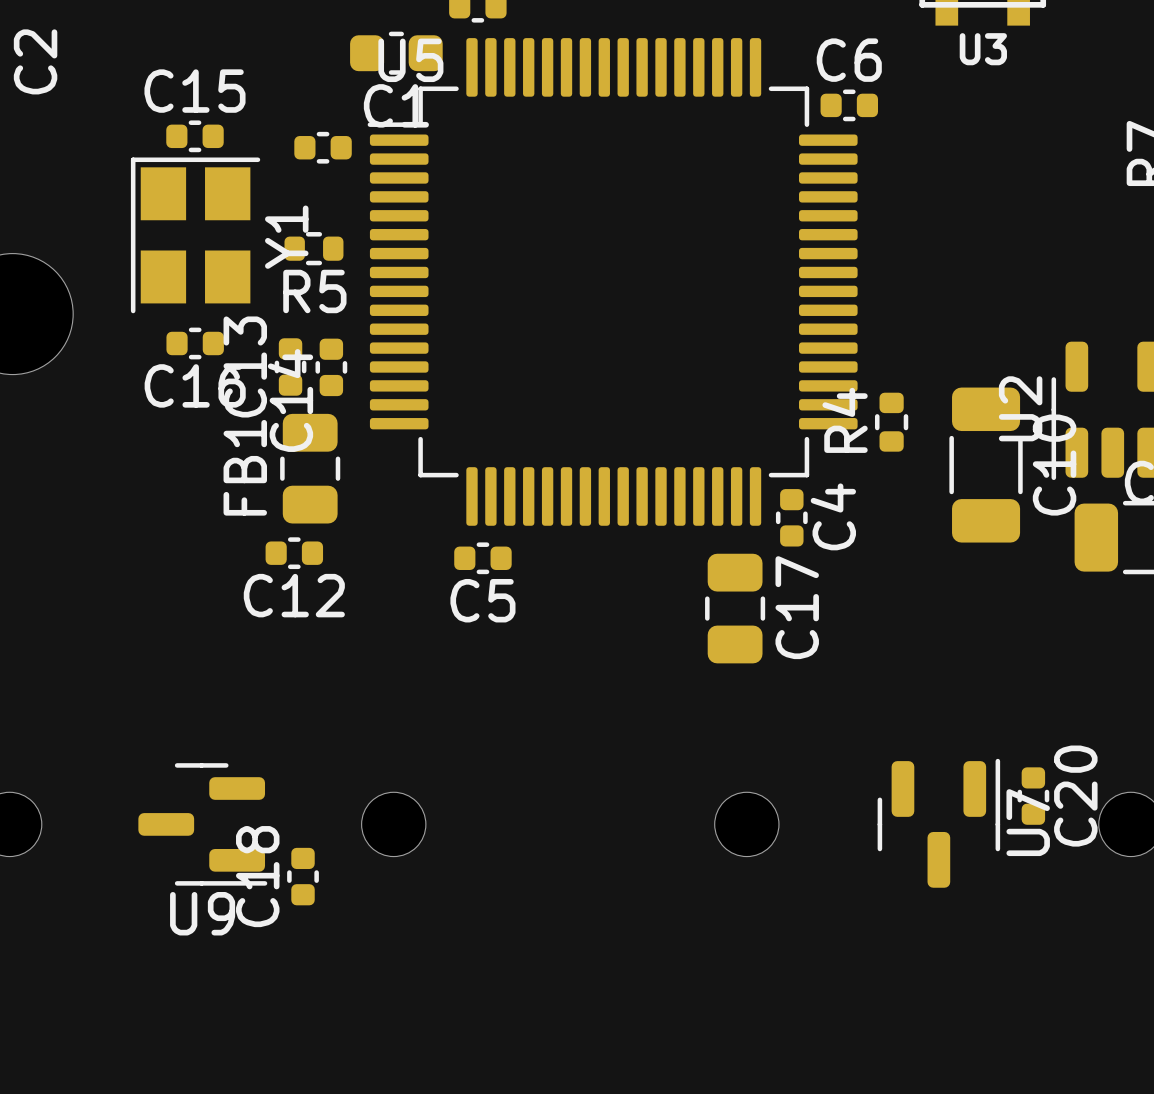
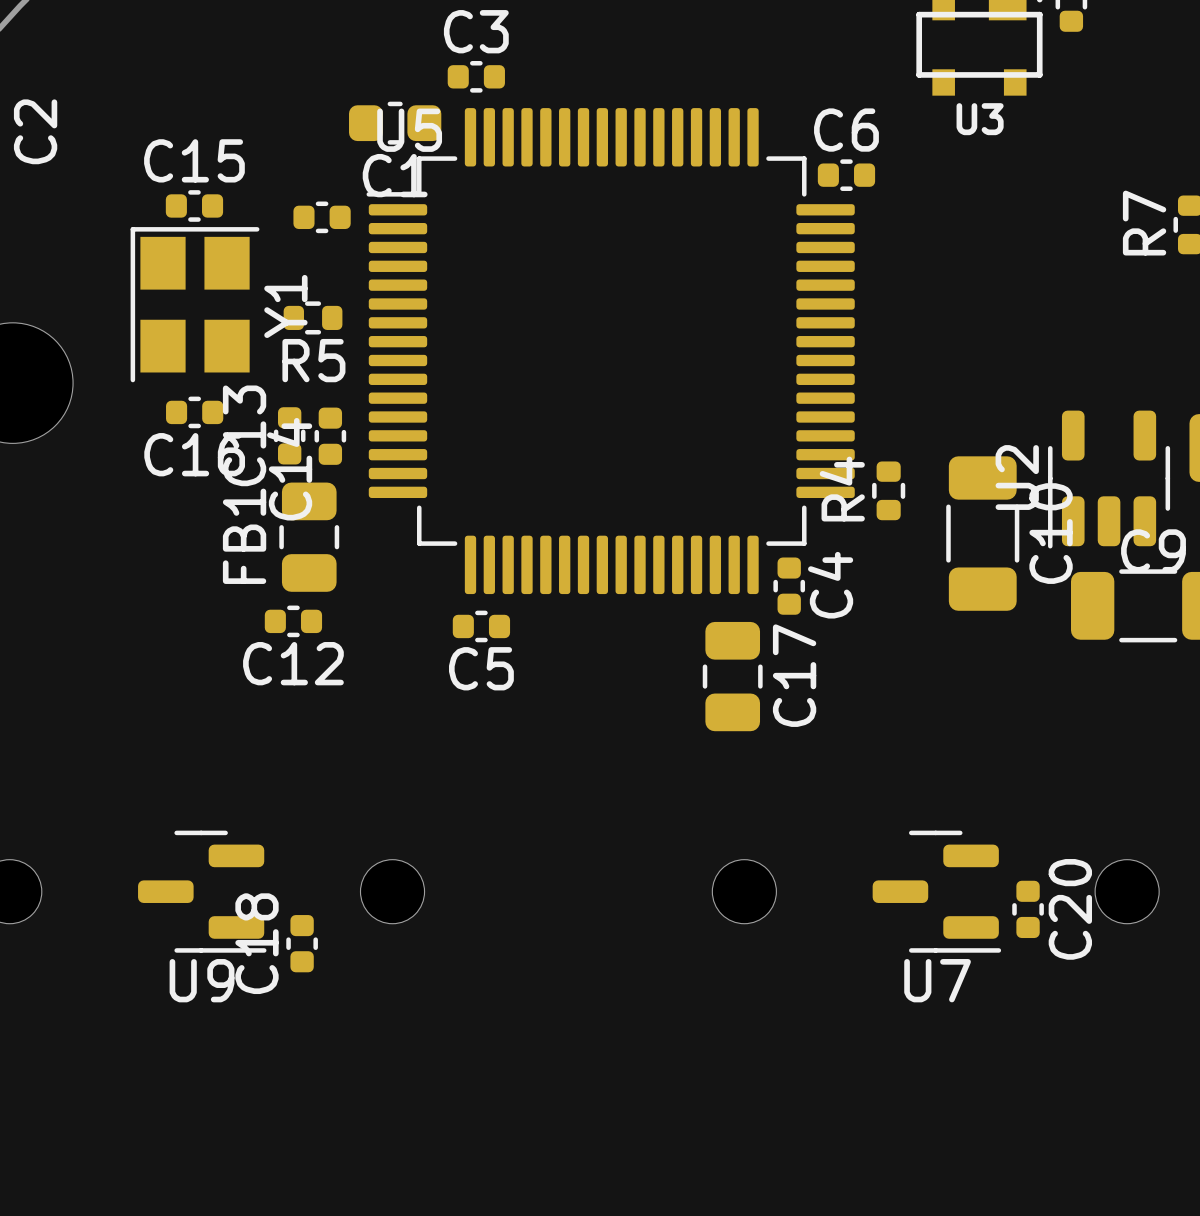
C20 position: (1033, 796) -> (1028, 909)
U7 rotation: 0° (938, 823) -> 90° clockwise (936, 891)

